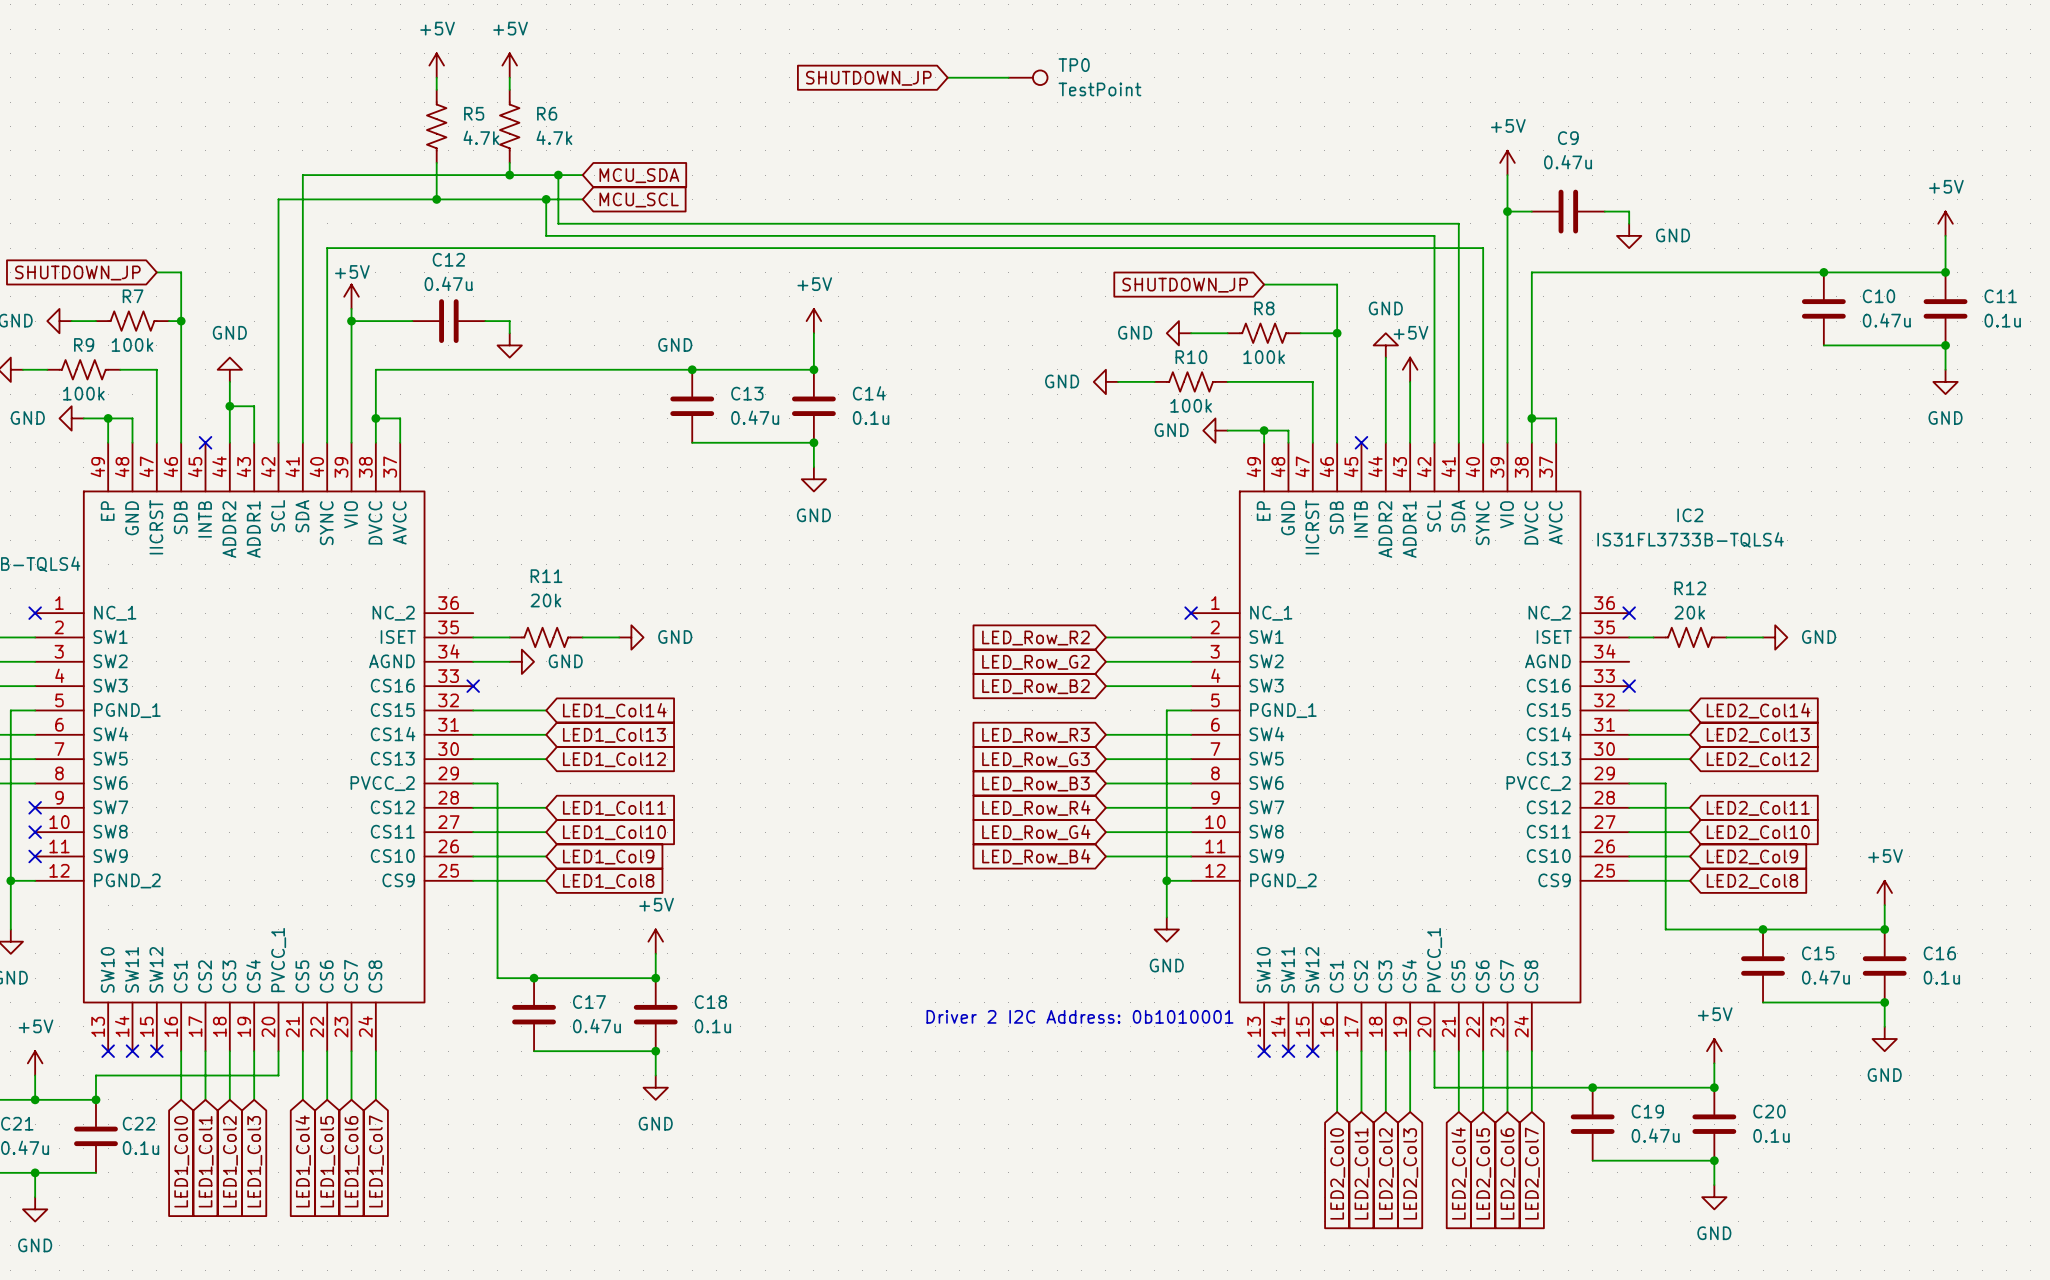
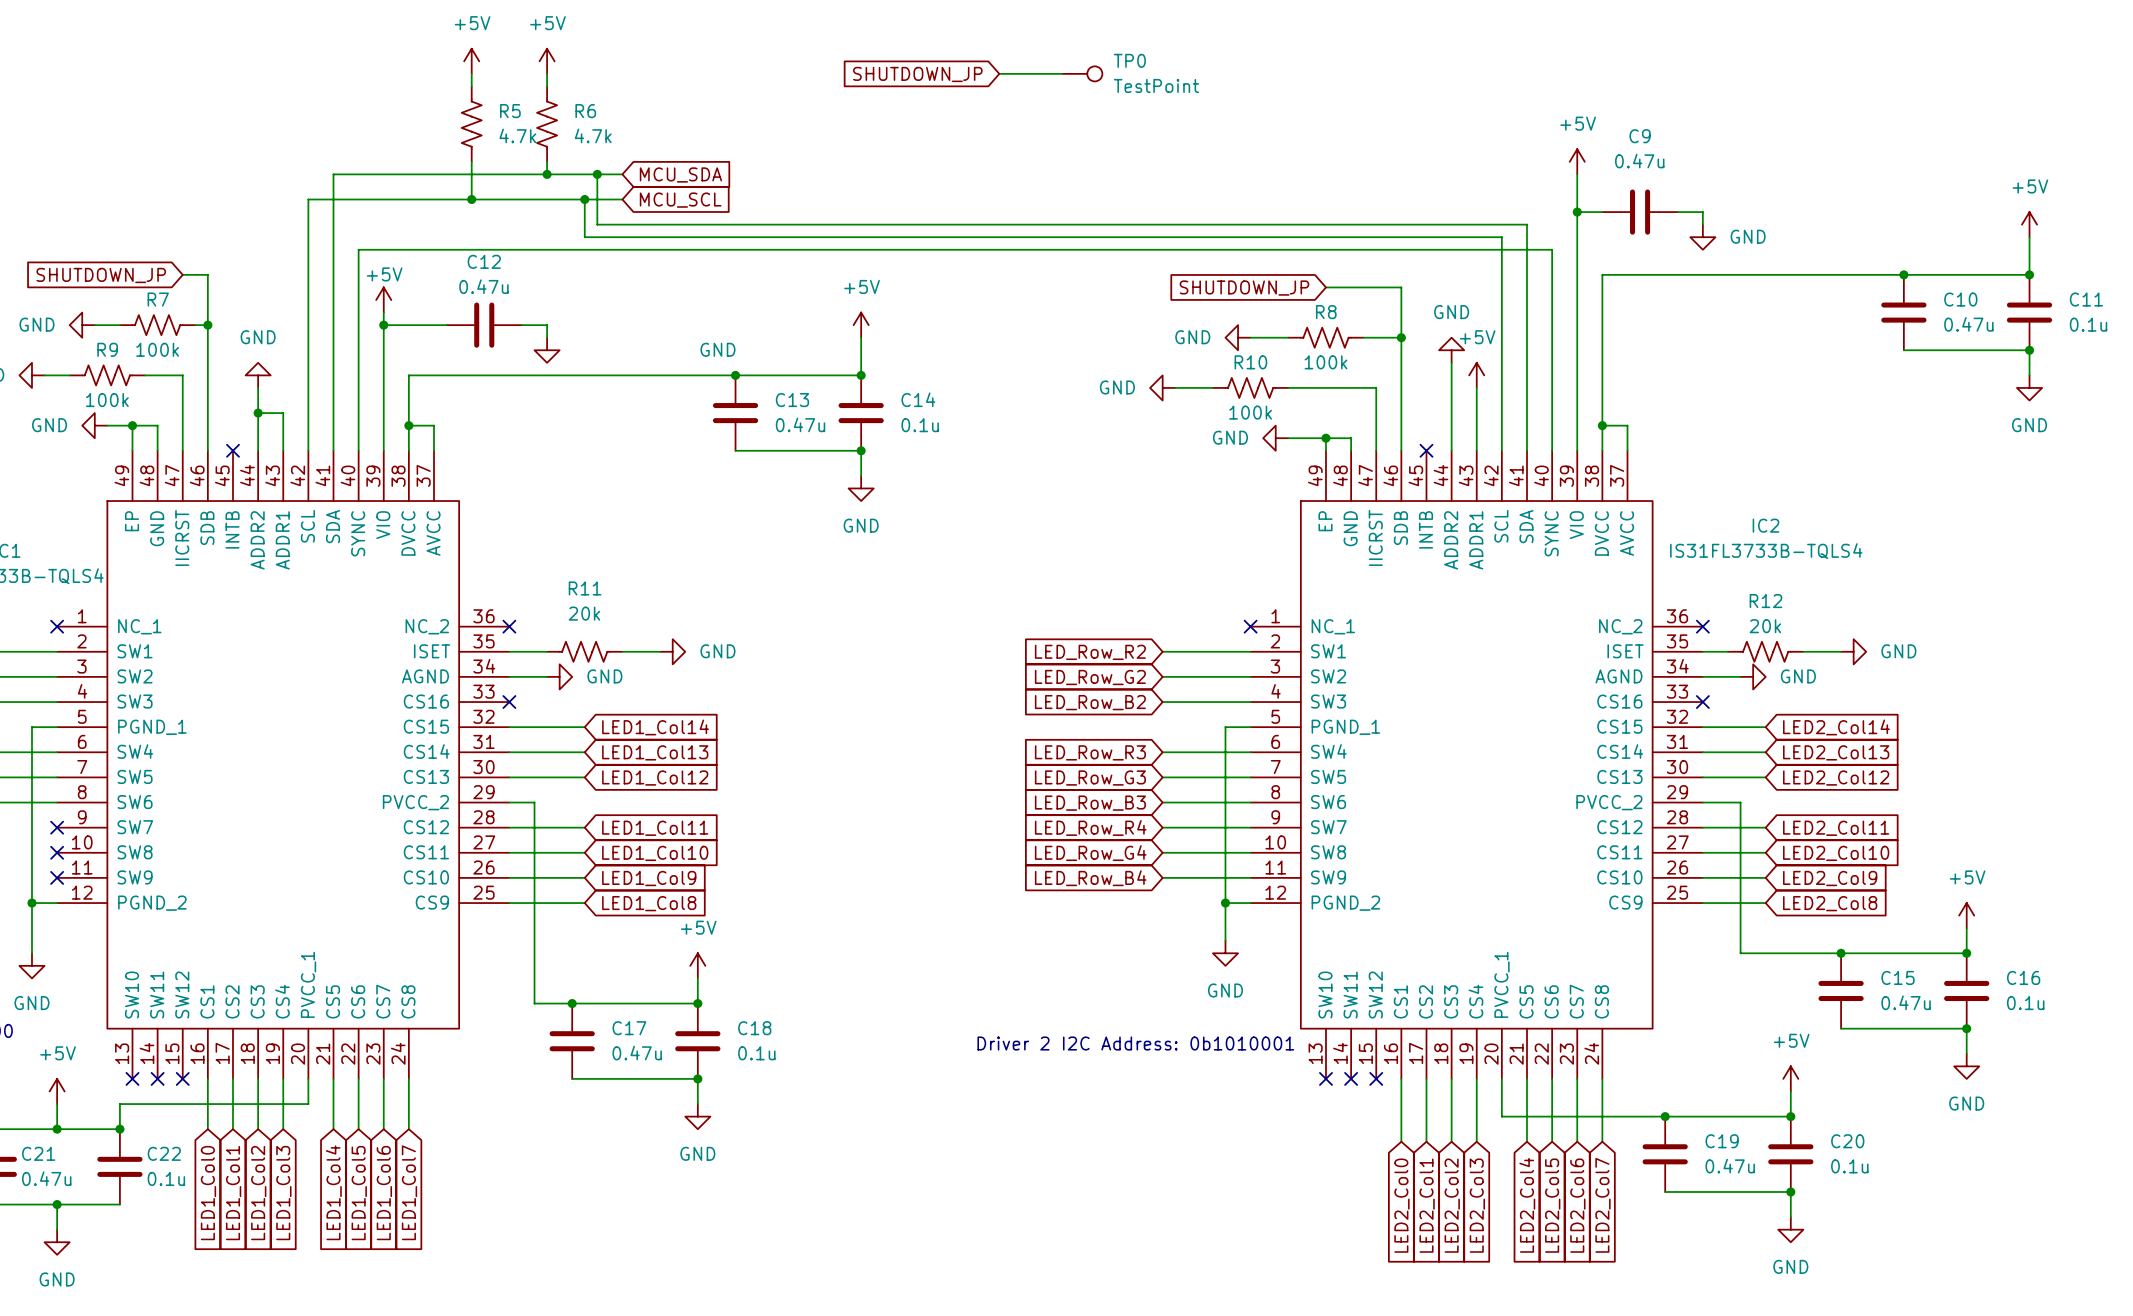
no-connect mark: none -> (509, 626)
wire: none -> (1702, 676) (1740, 676)
power symbol: none -> GND (1753, 676)

